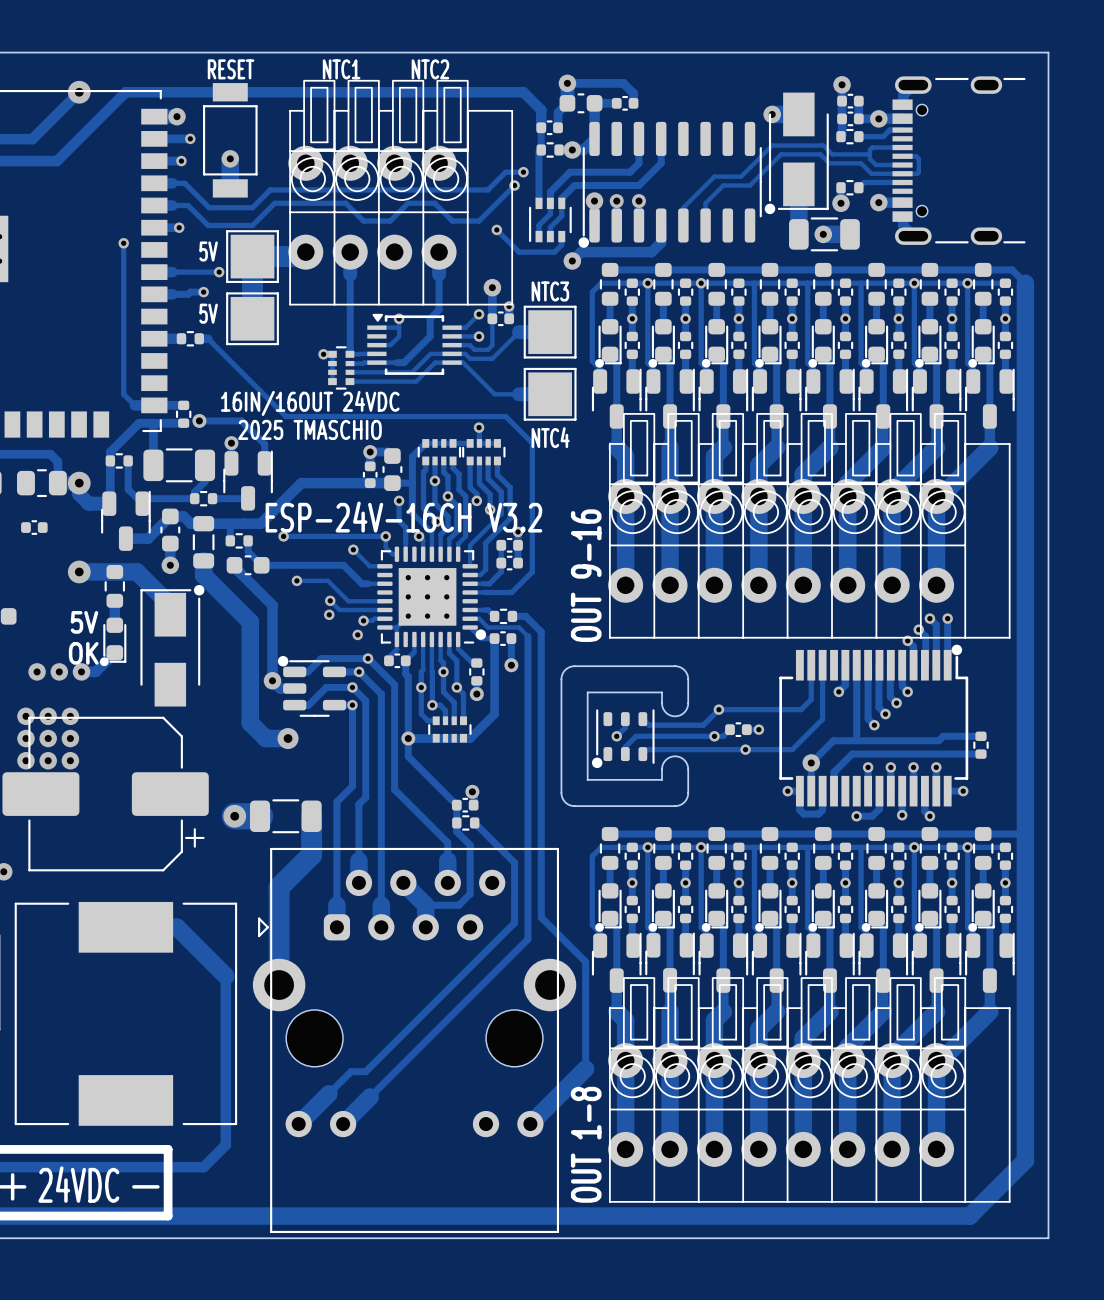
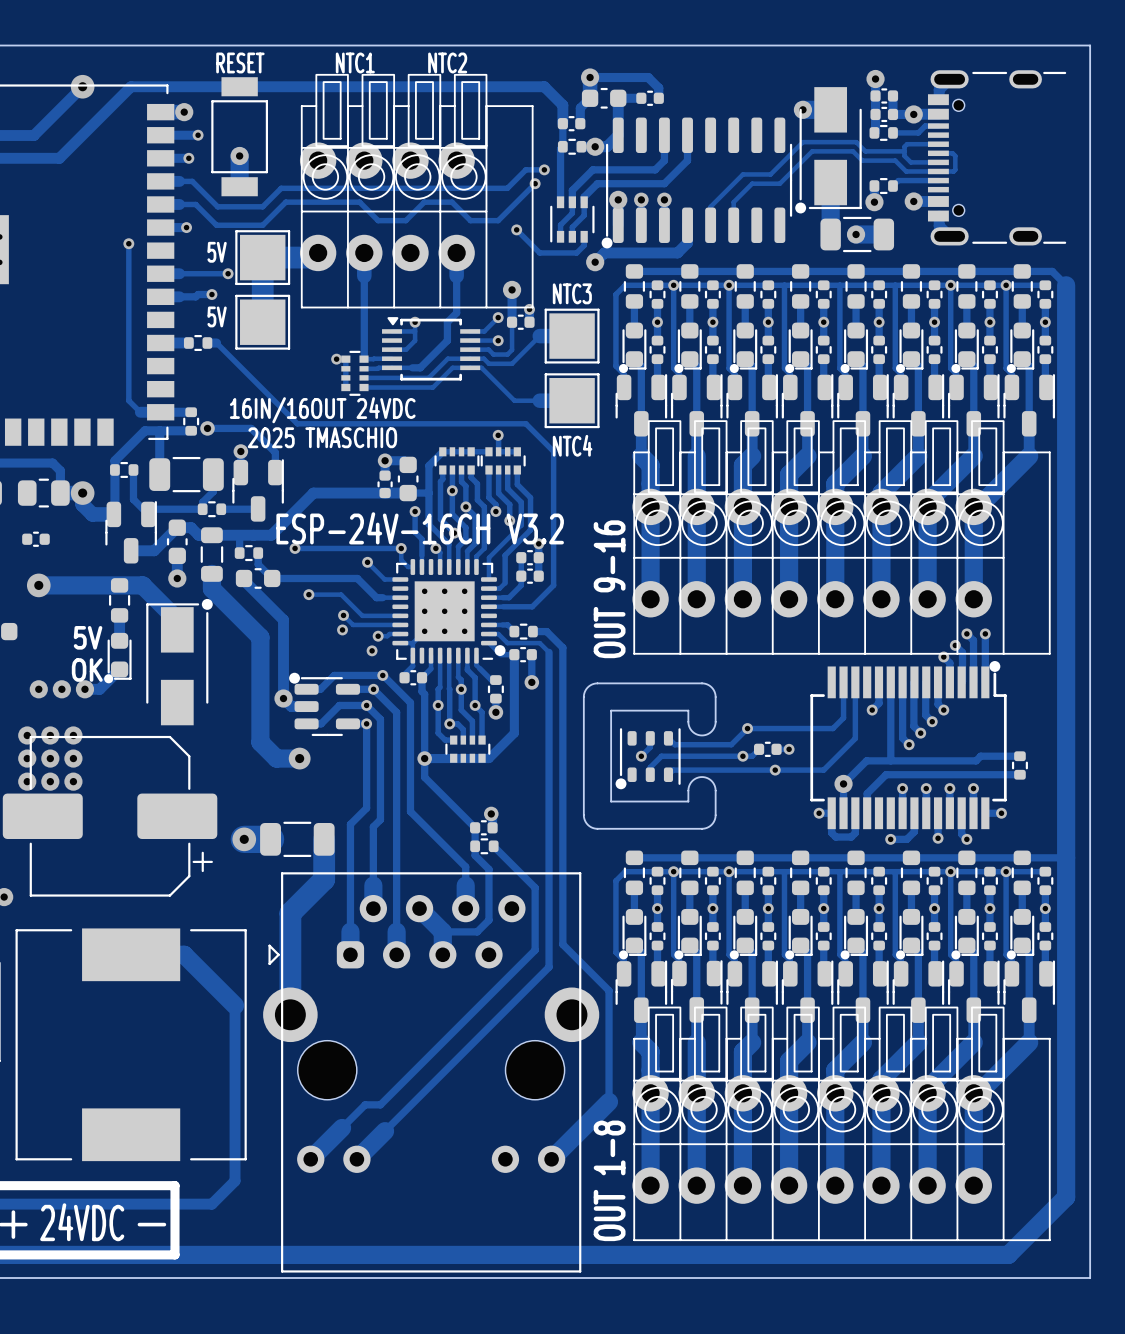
track: none -> (38, 585) (82, 585)
via position: (79, 571) -> (38, 585)

